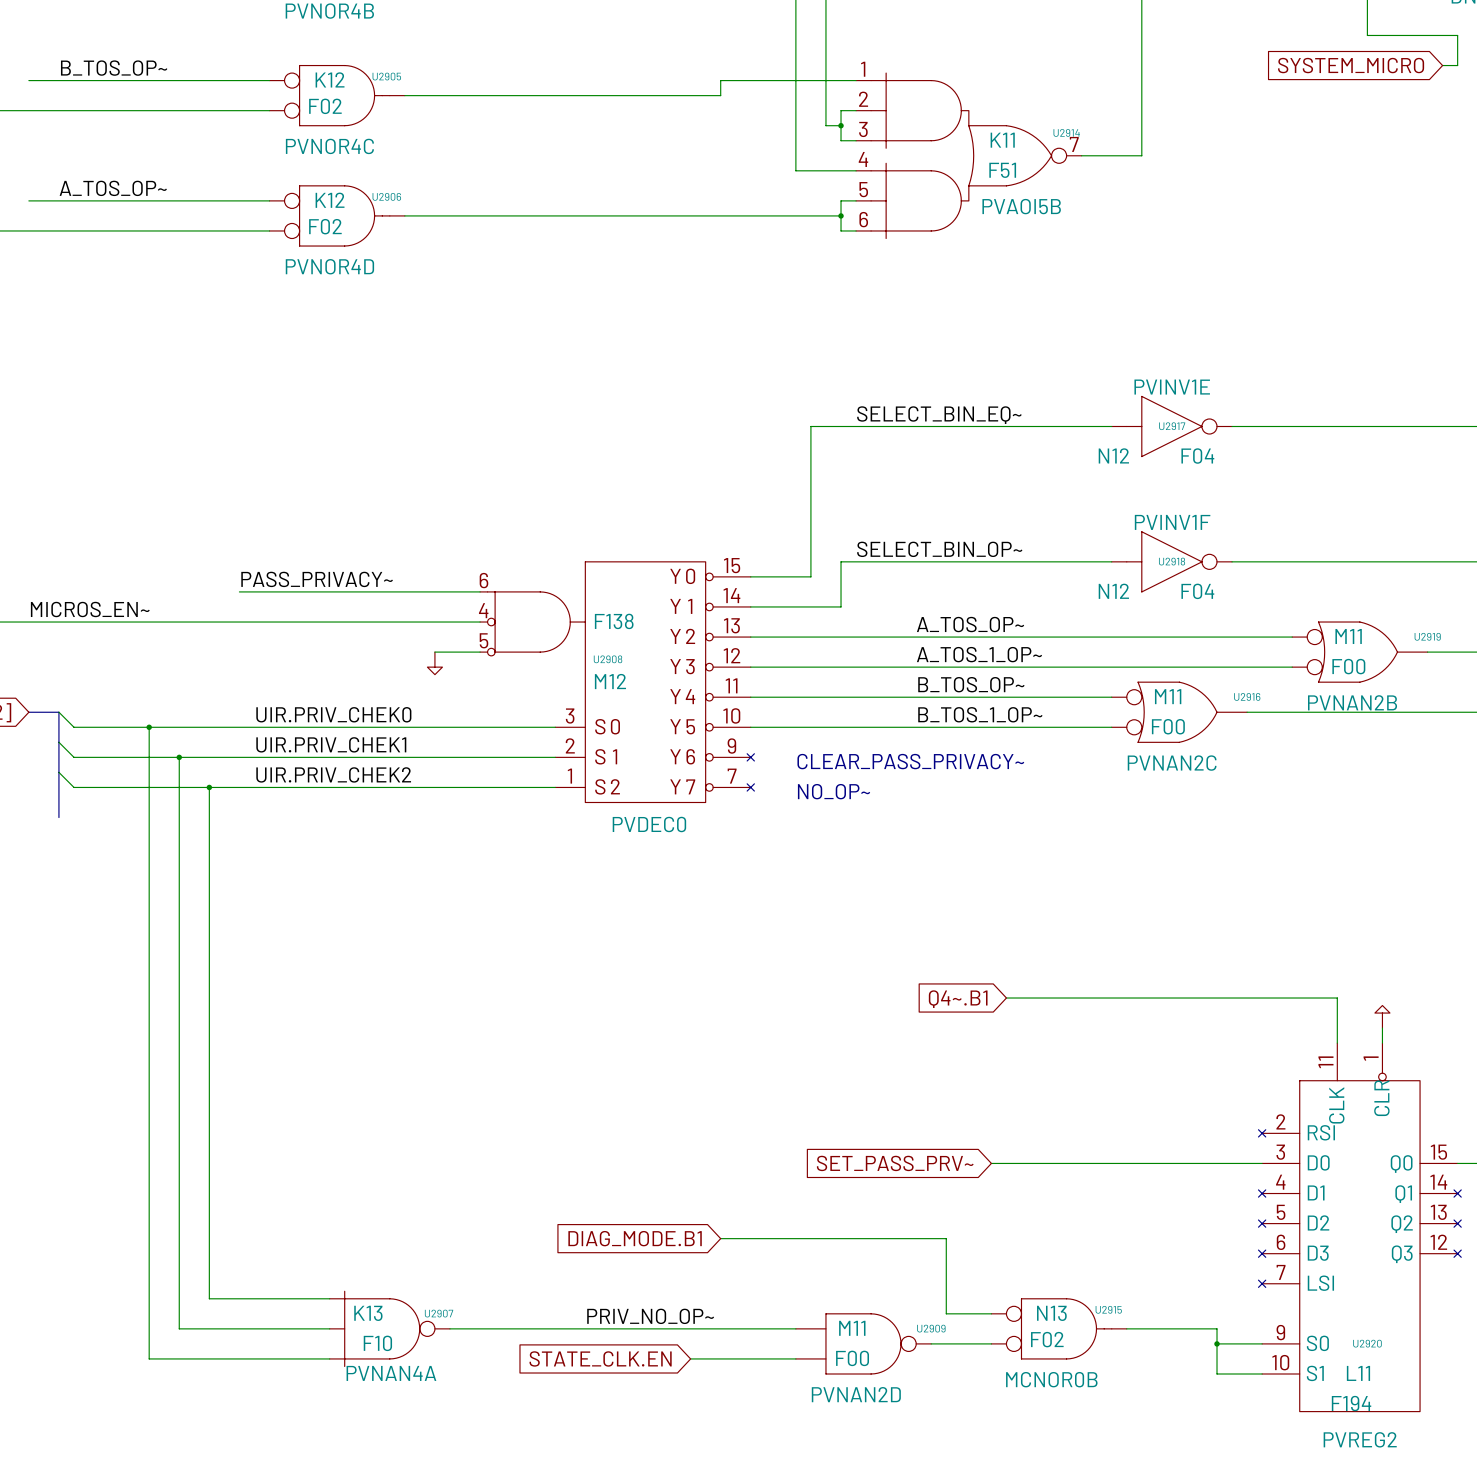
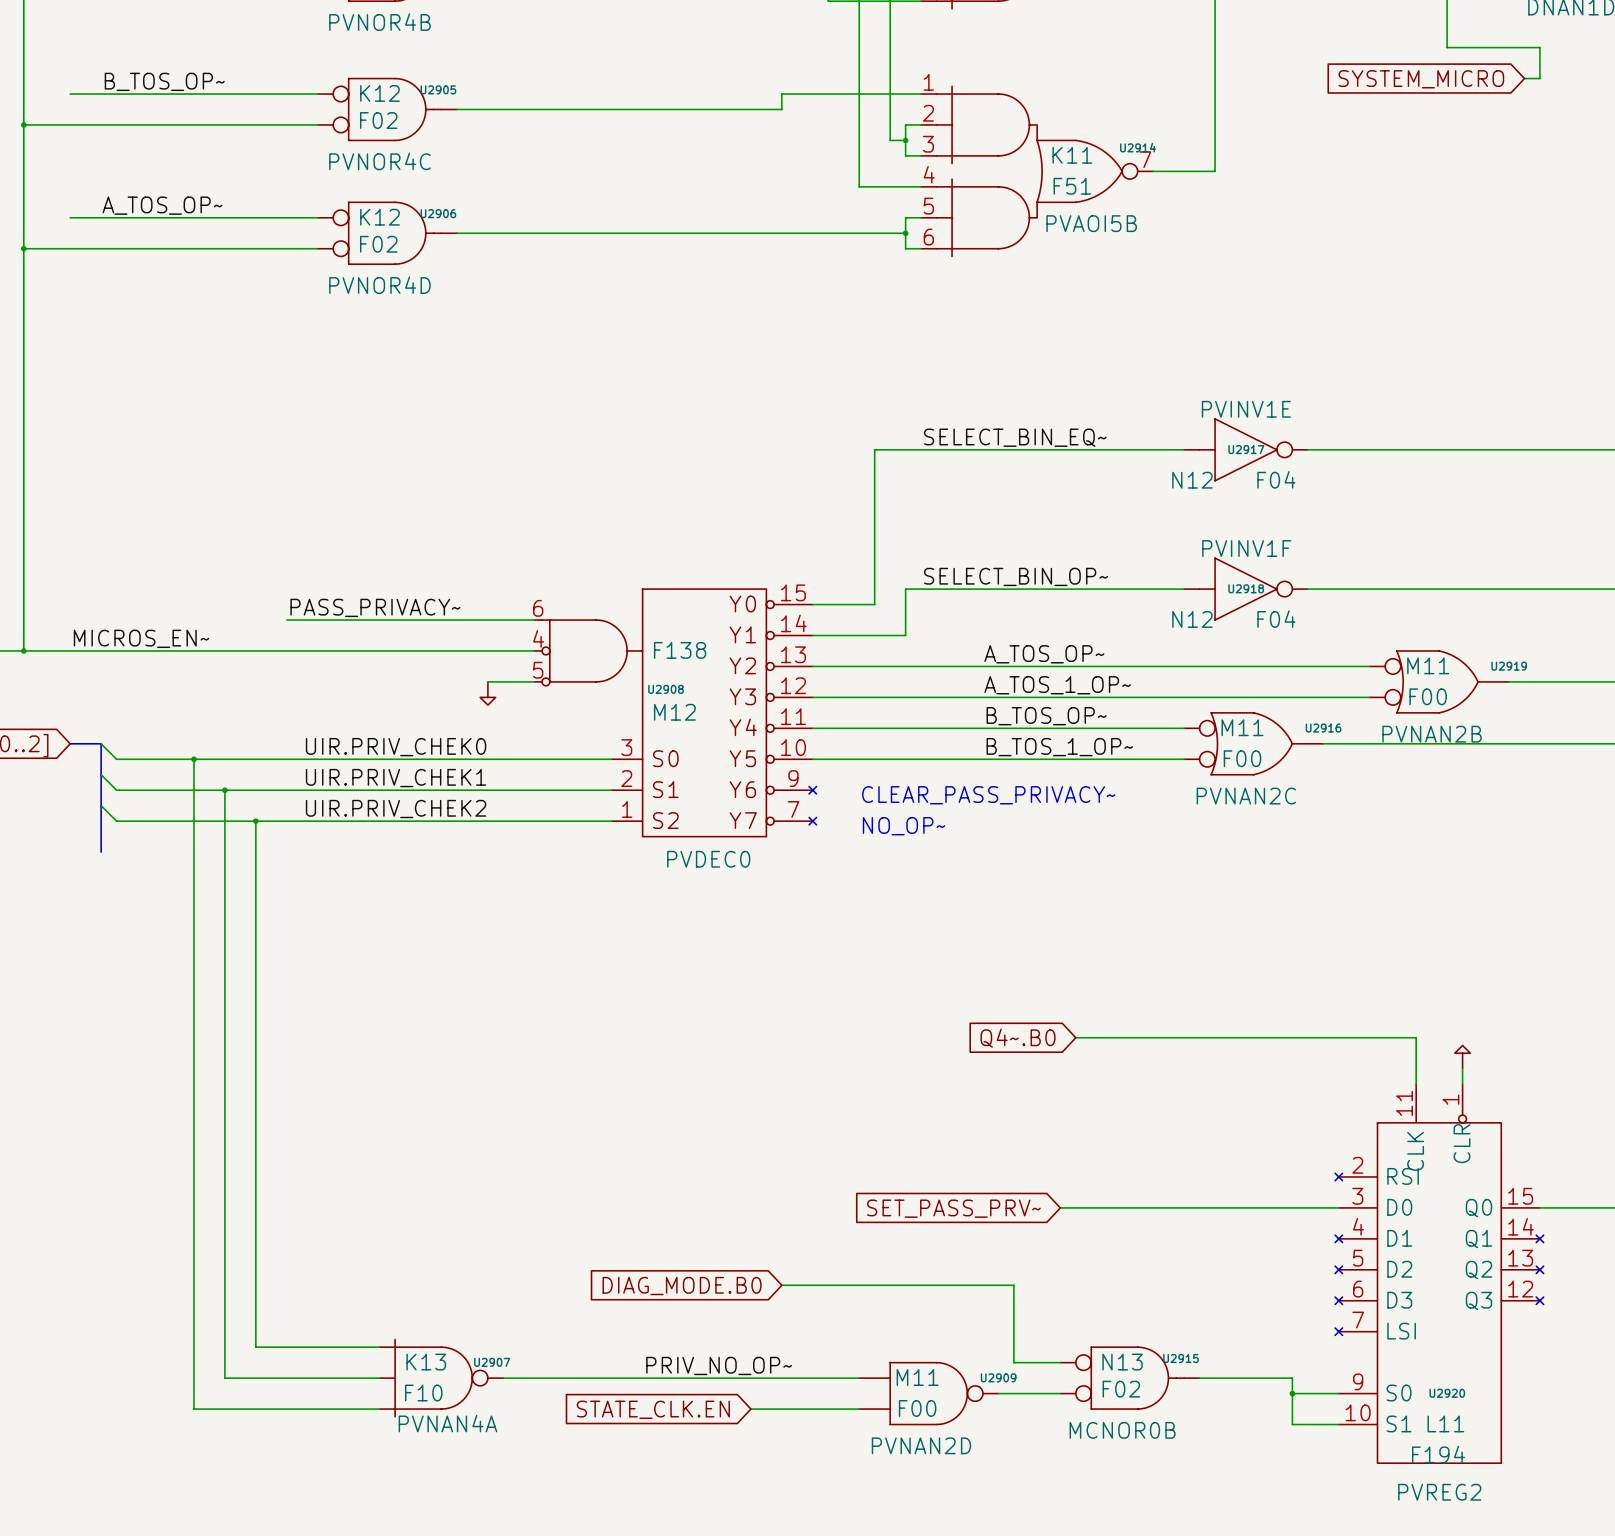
global label: Q4~.B1 (958, 999) -> Q4~.B0 (1018, 1038)
global label: DIAG_MODE.B1 (635, 1238) -> DIAG_MODE.B0 (682, 1286)

